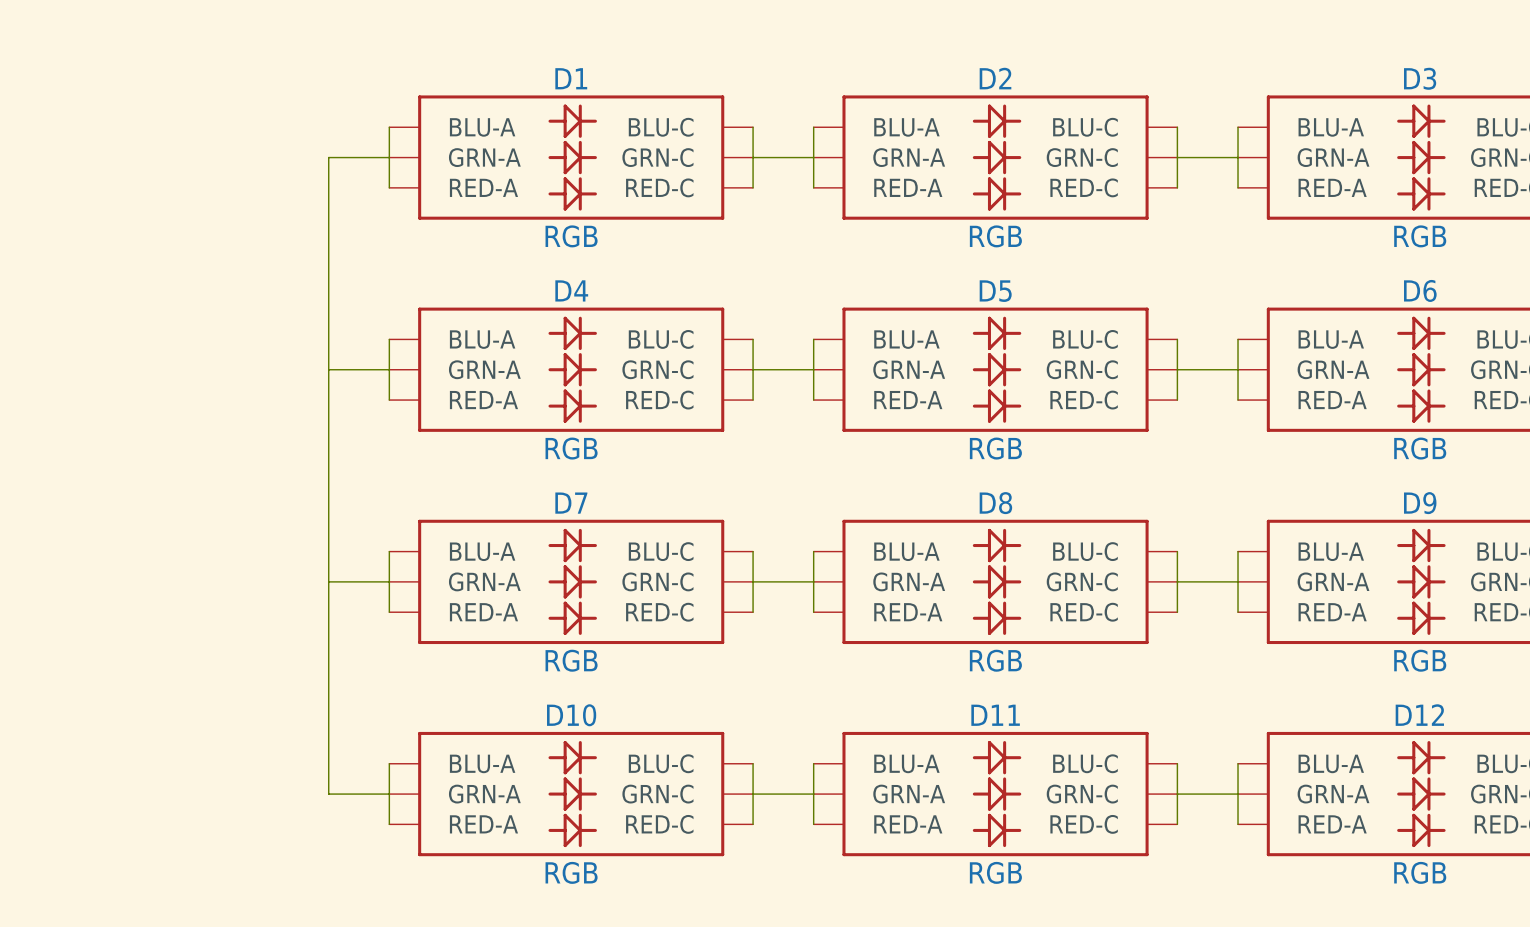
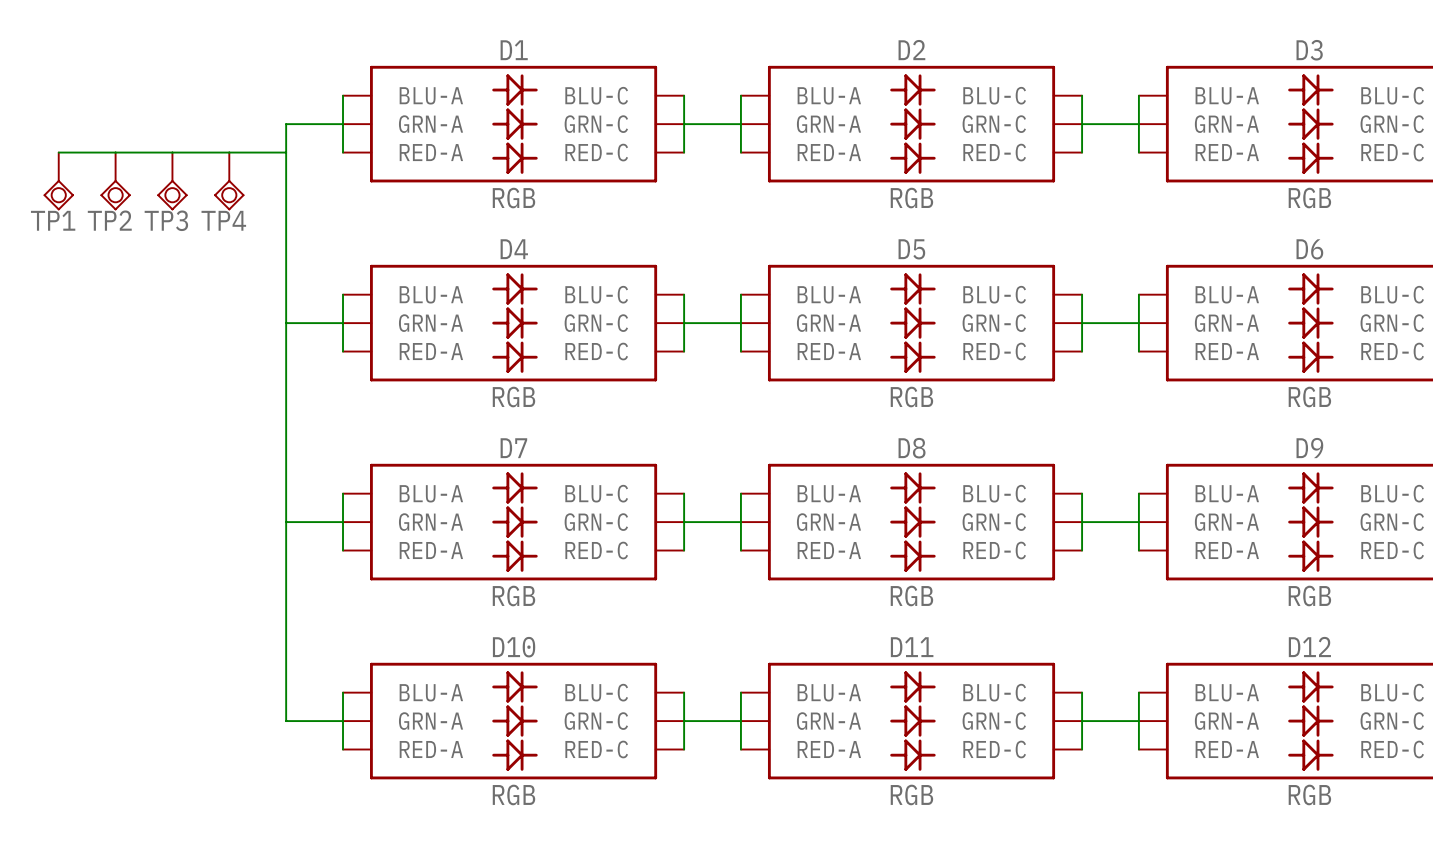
wire: none -> (58, 152) (286, 152)
TP1: none -> (58, 181)
TP2: none -> (115, 181)
TP3: none -> (172, 181)
TP4: none -> (229, 181)

